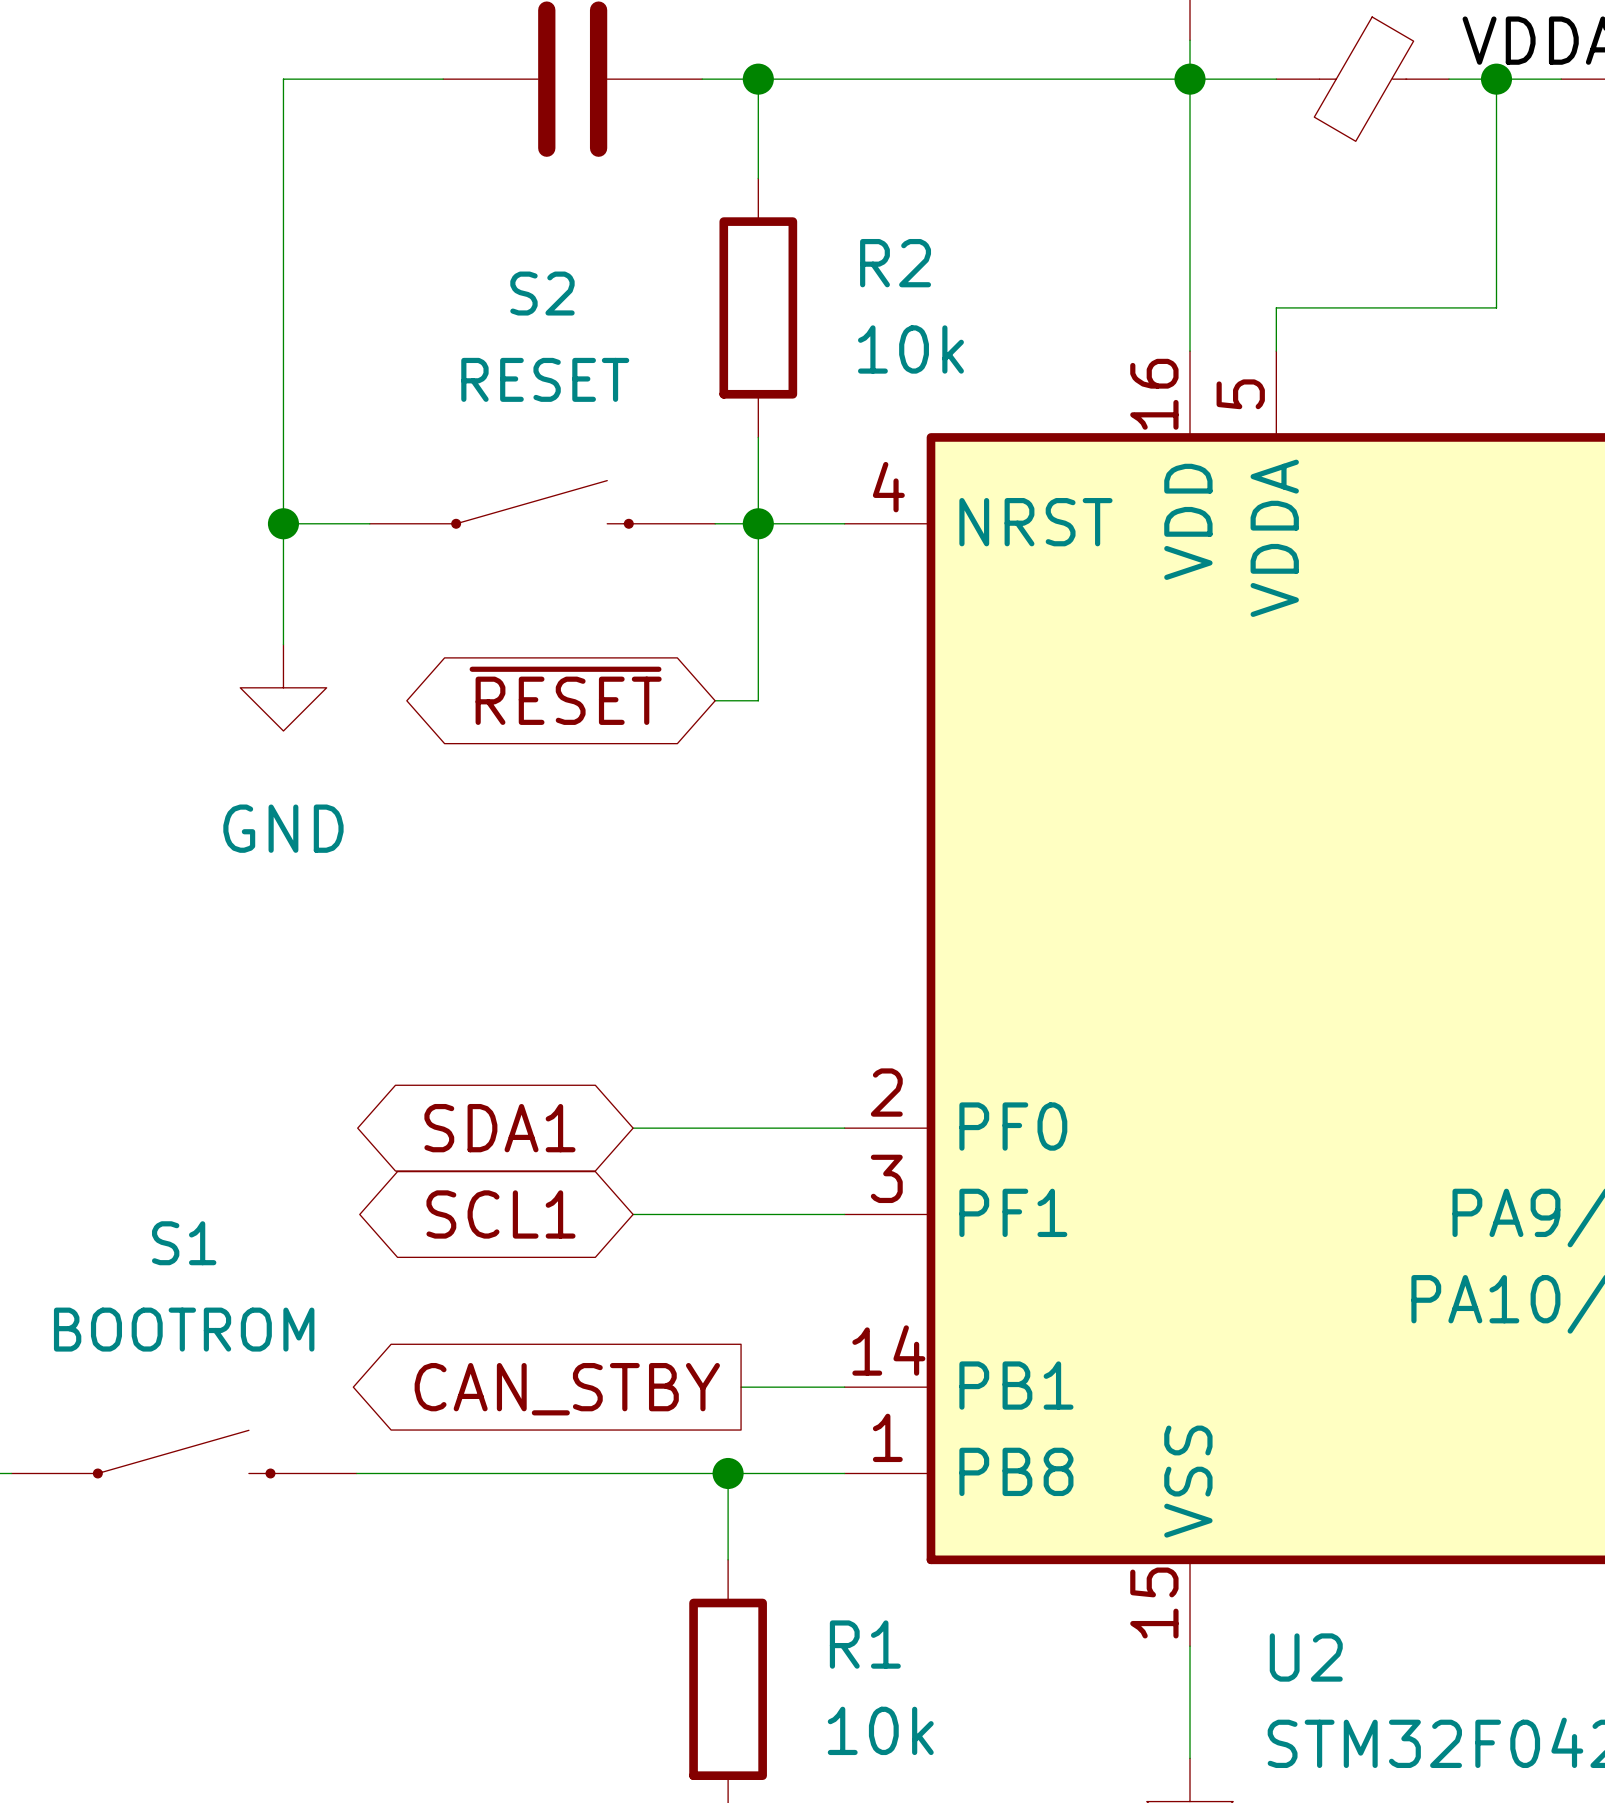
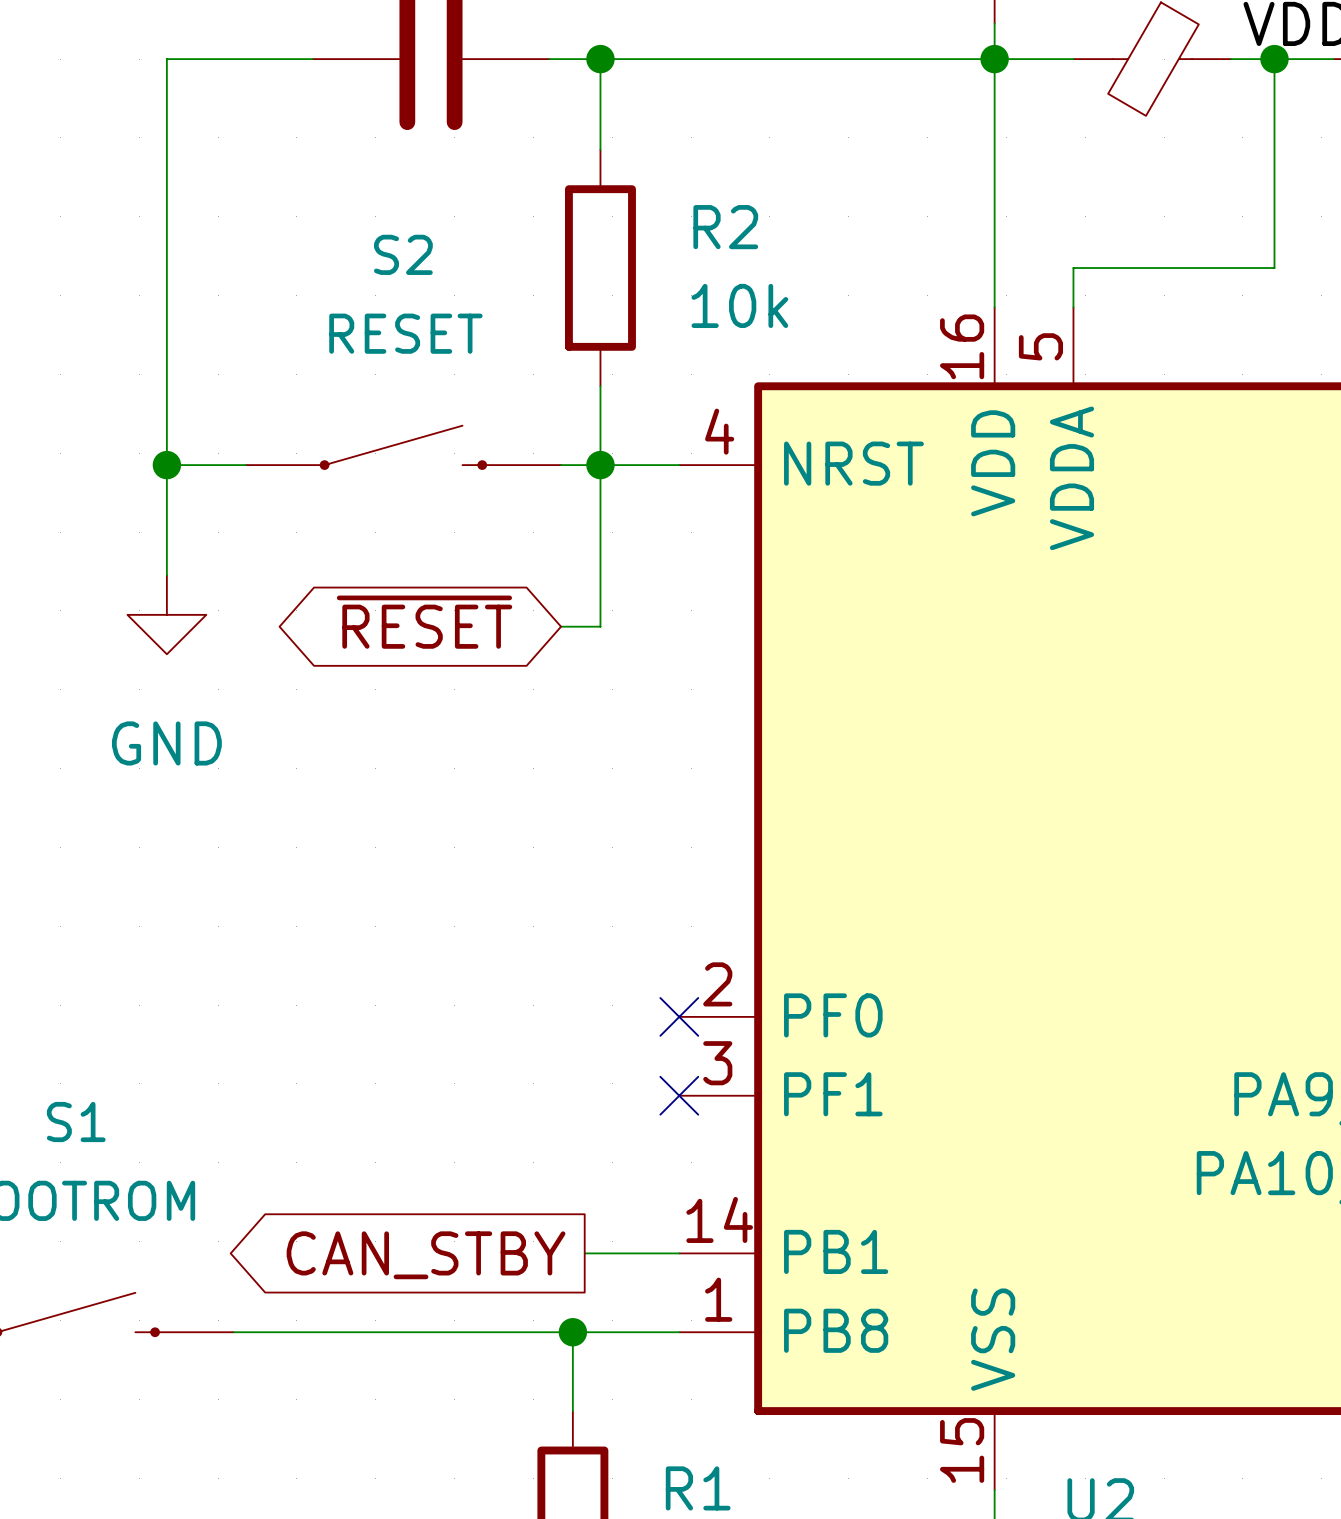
global label: SDA1 (499, 1128) -> none
wire: (633, 1128) (844, 1128) -> none
no-connect mark: none -> (679, 1016)
global label: SCL1 (500, 1214) -> none
wire: (633, 1214) (844, 1214) -> none
no-connect mark: none -> (679, 1095)

